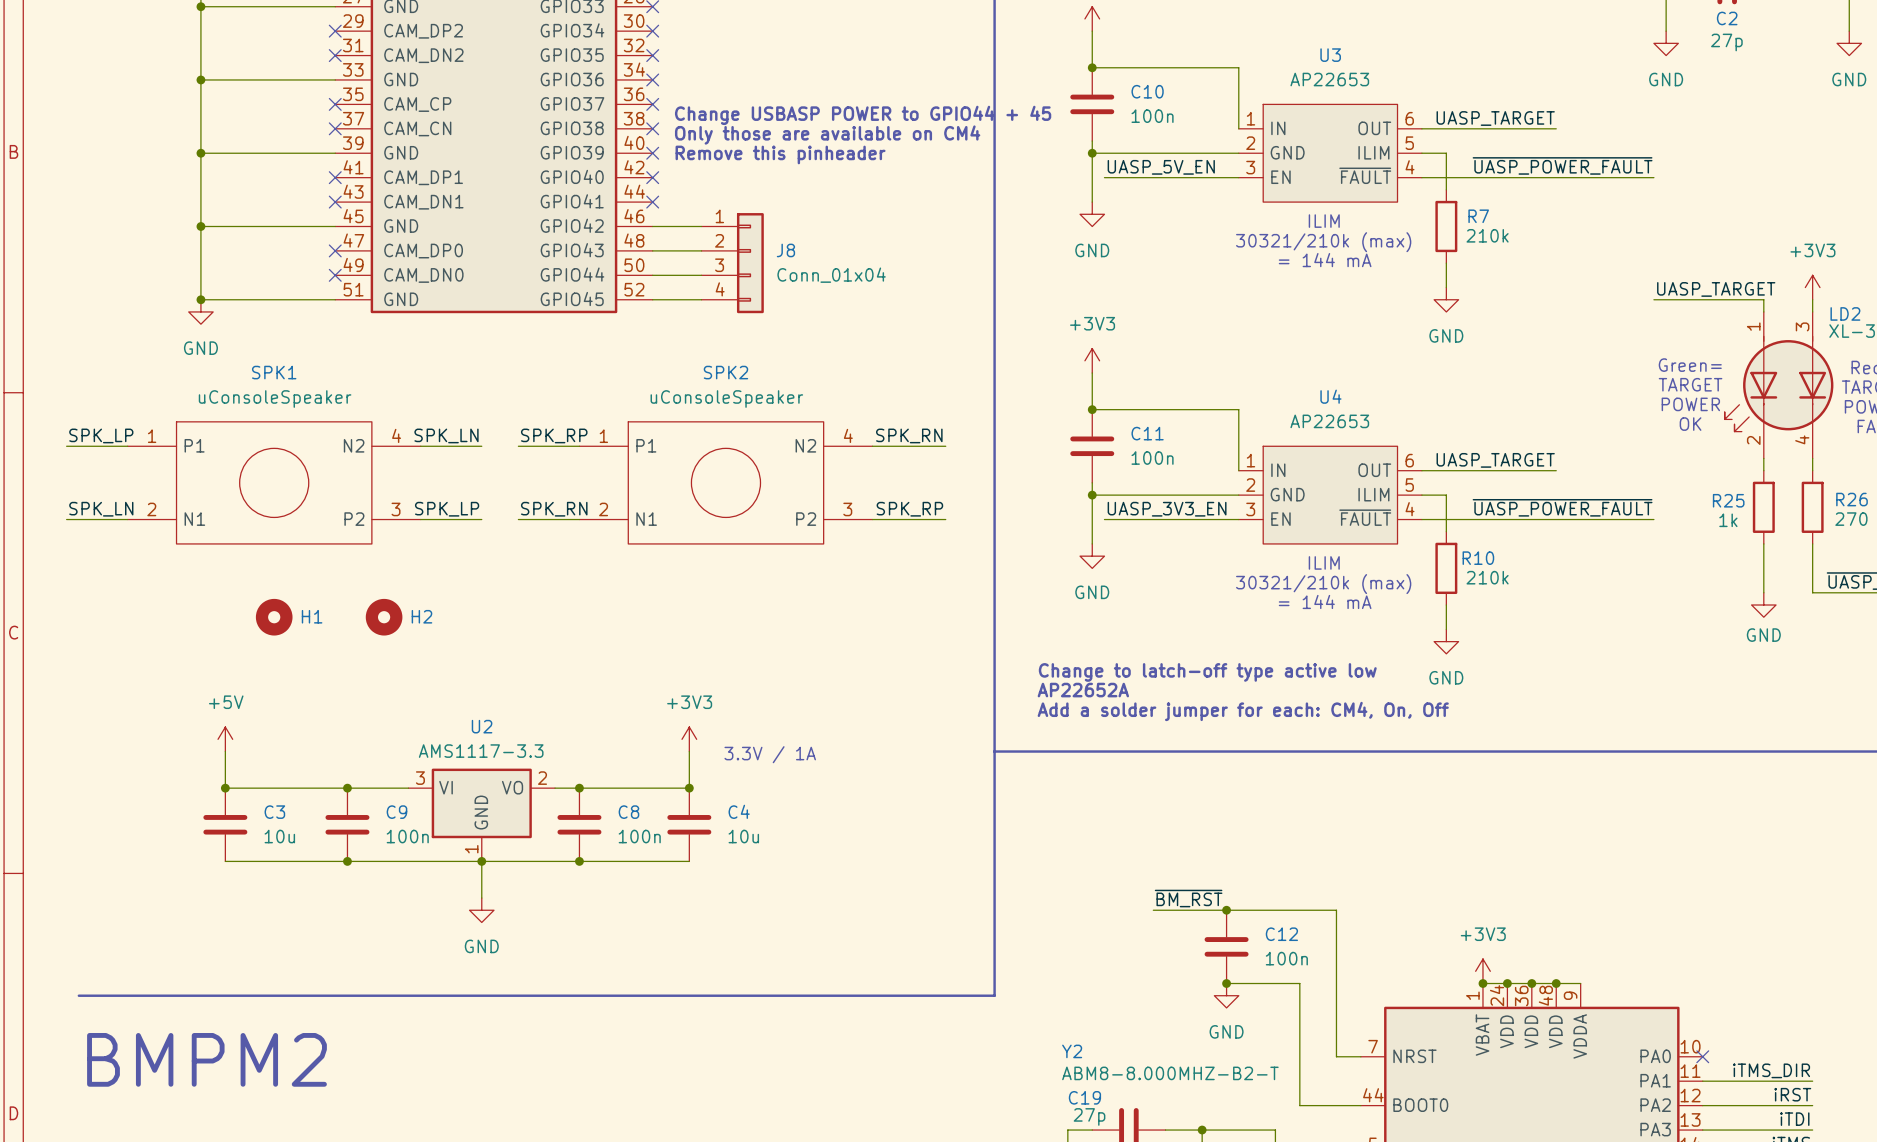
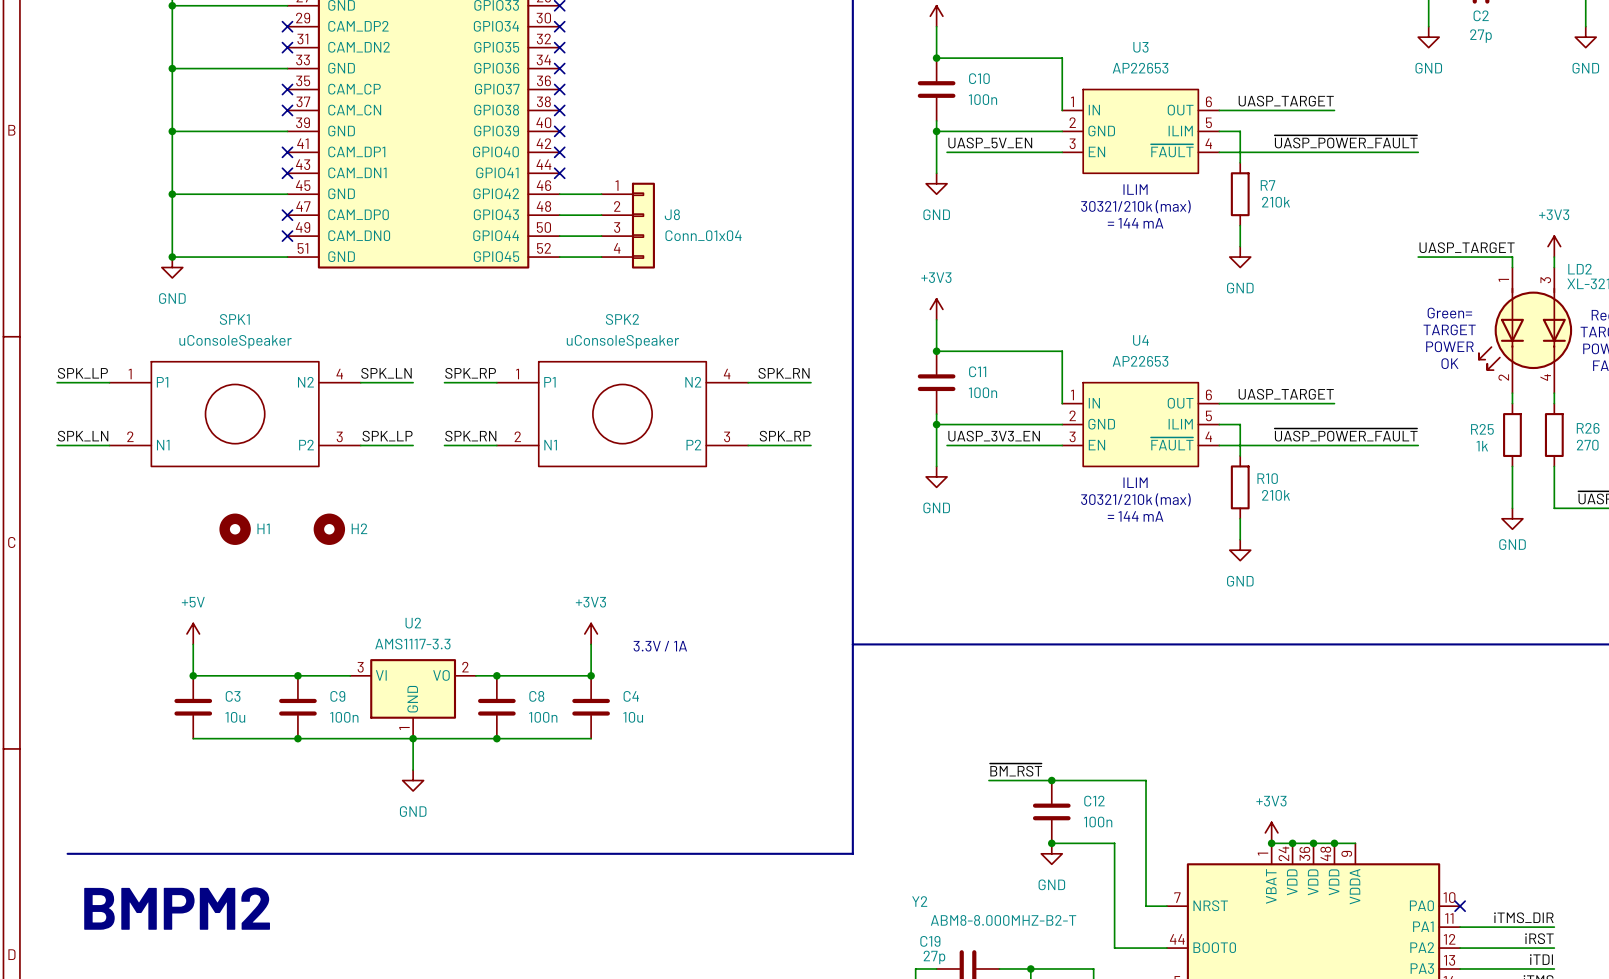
text: Change USBASP POWER to GPIO44 + 45 (863, 115) -> none
text: Only those are available on CM4 (827, 135) -> none
text: Remove this pinheader (780, 154) -> none
text: Change to latch-off type active low (1207, 672) -> none
text: AP22652A (1083, 690) -> none
text: Add a solder jumper for each: CM4, On, Off (1243, 711) -> none

